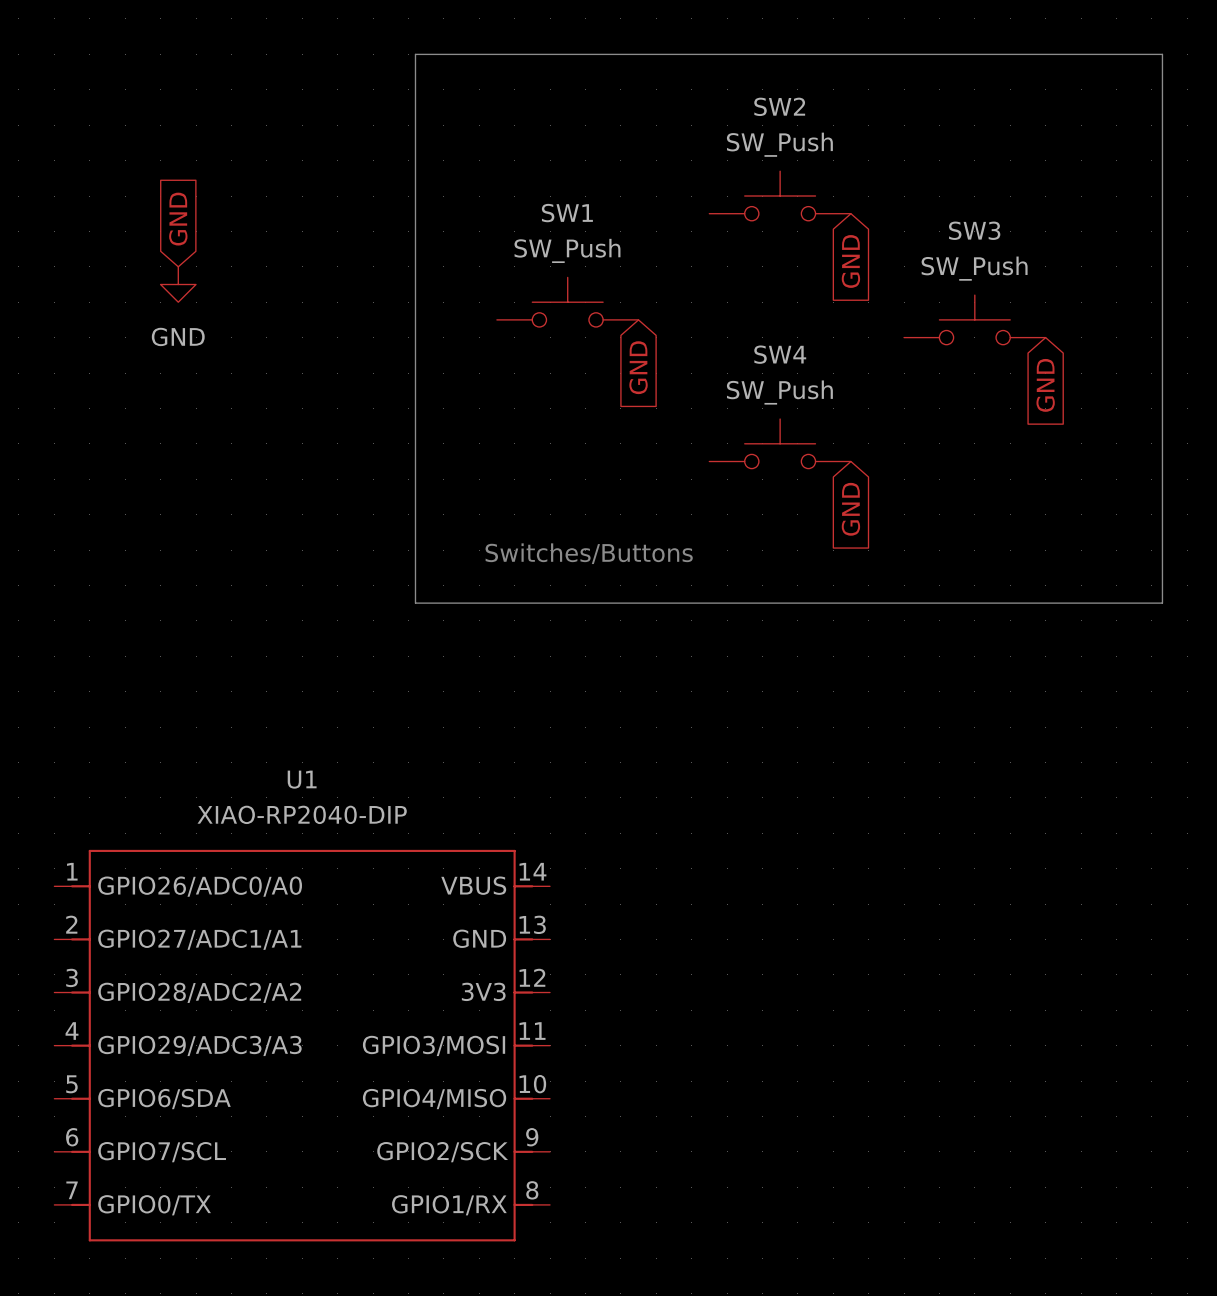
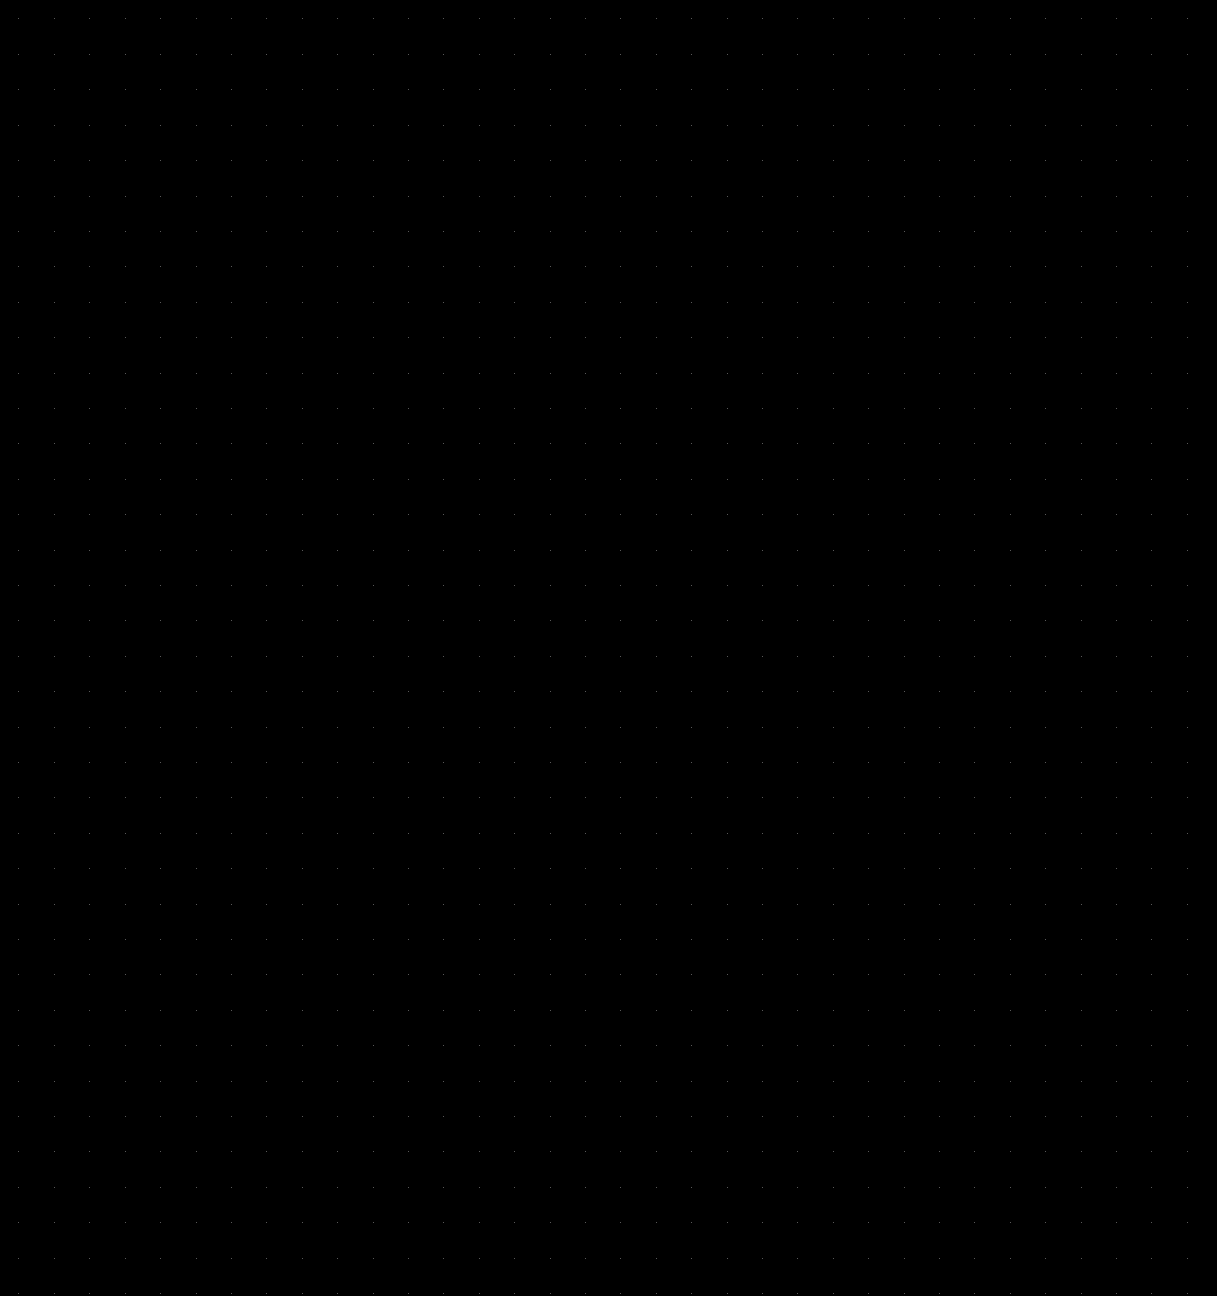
line: (415, 54) (1162, 54) (1162, 603) (415, 603) (415, 54) -> none
SW2: SW_Push (780, 196) -> none
global label: GND (178, 219) -> none
global label: GND (850, 261) -> none
power symbol: GND (178, 284) -> none
SW1: SW_Push (567, 302) -> none
SW3: SW_Push (974, 319) -> none
global label: GND (638, 367) -> none
global label: GND (1045, 385) -> none
SW4: SW_Push (780, 443) -> none
global label: GND (850, 509) -> none
text: Switches/Buttons (589, 553) -> none
U1: XIAO-RP2040-DIP (302, 1045) -> none

